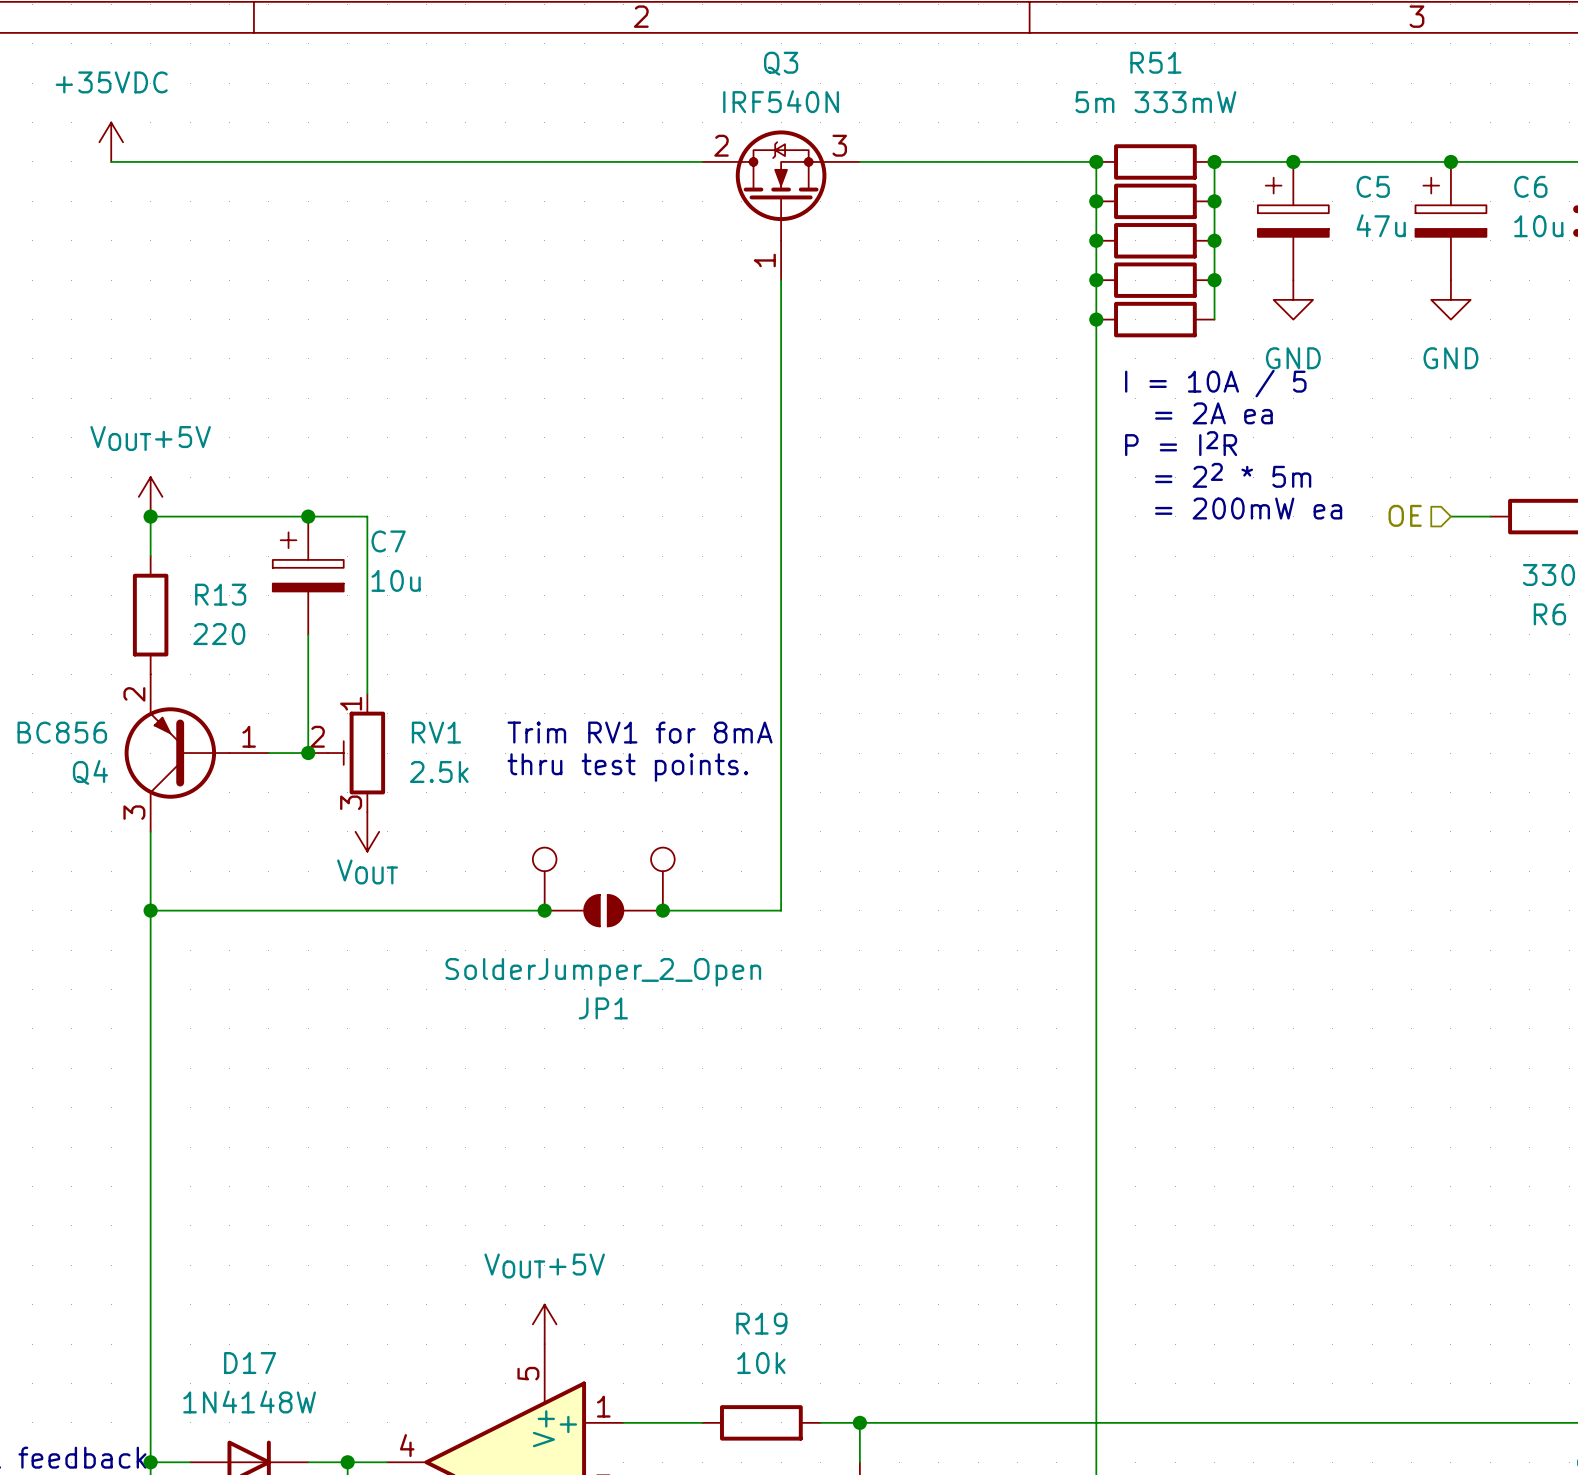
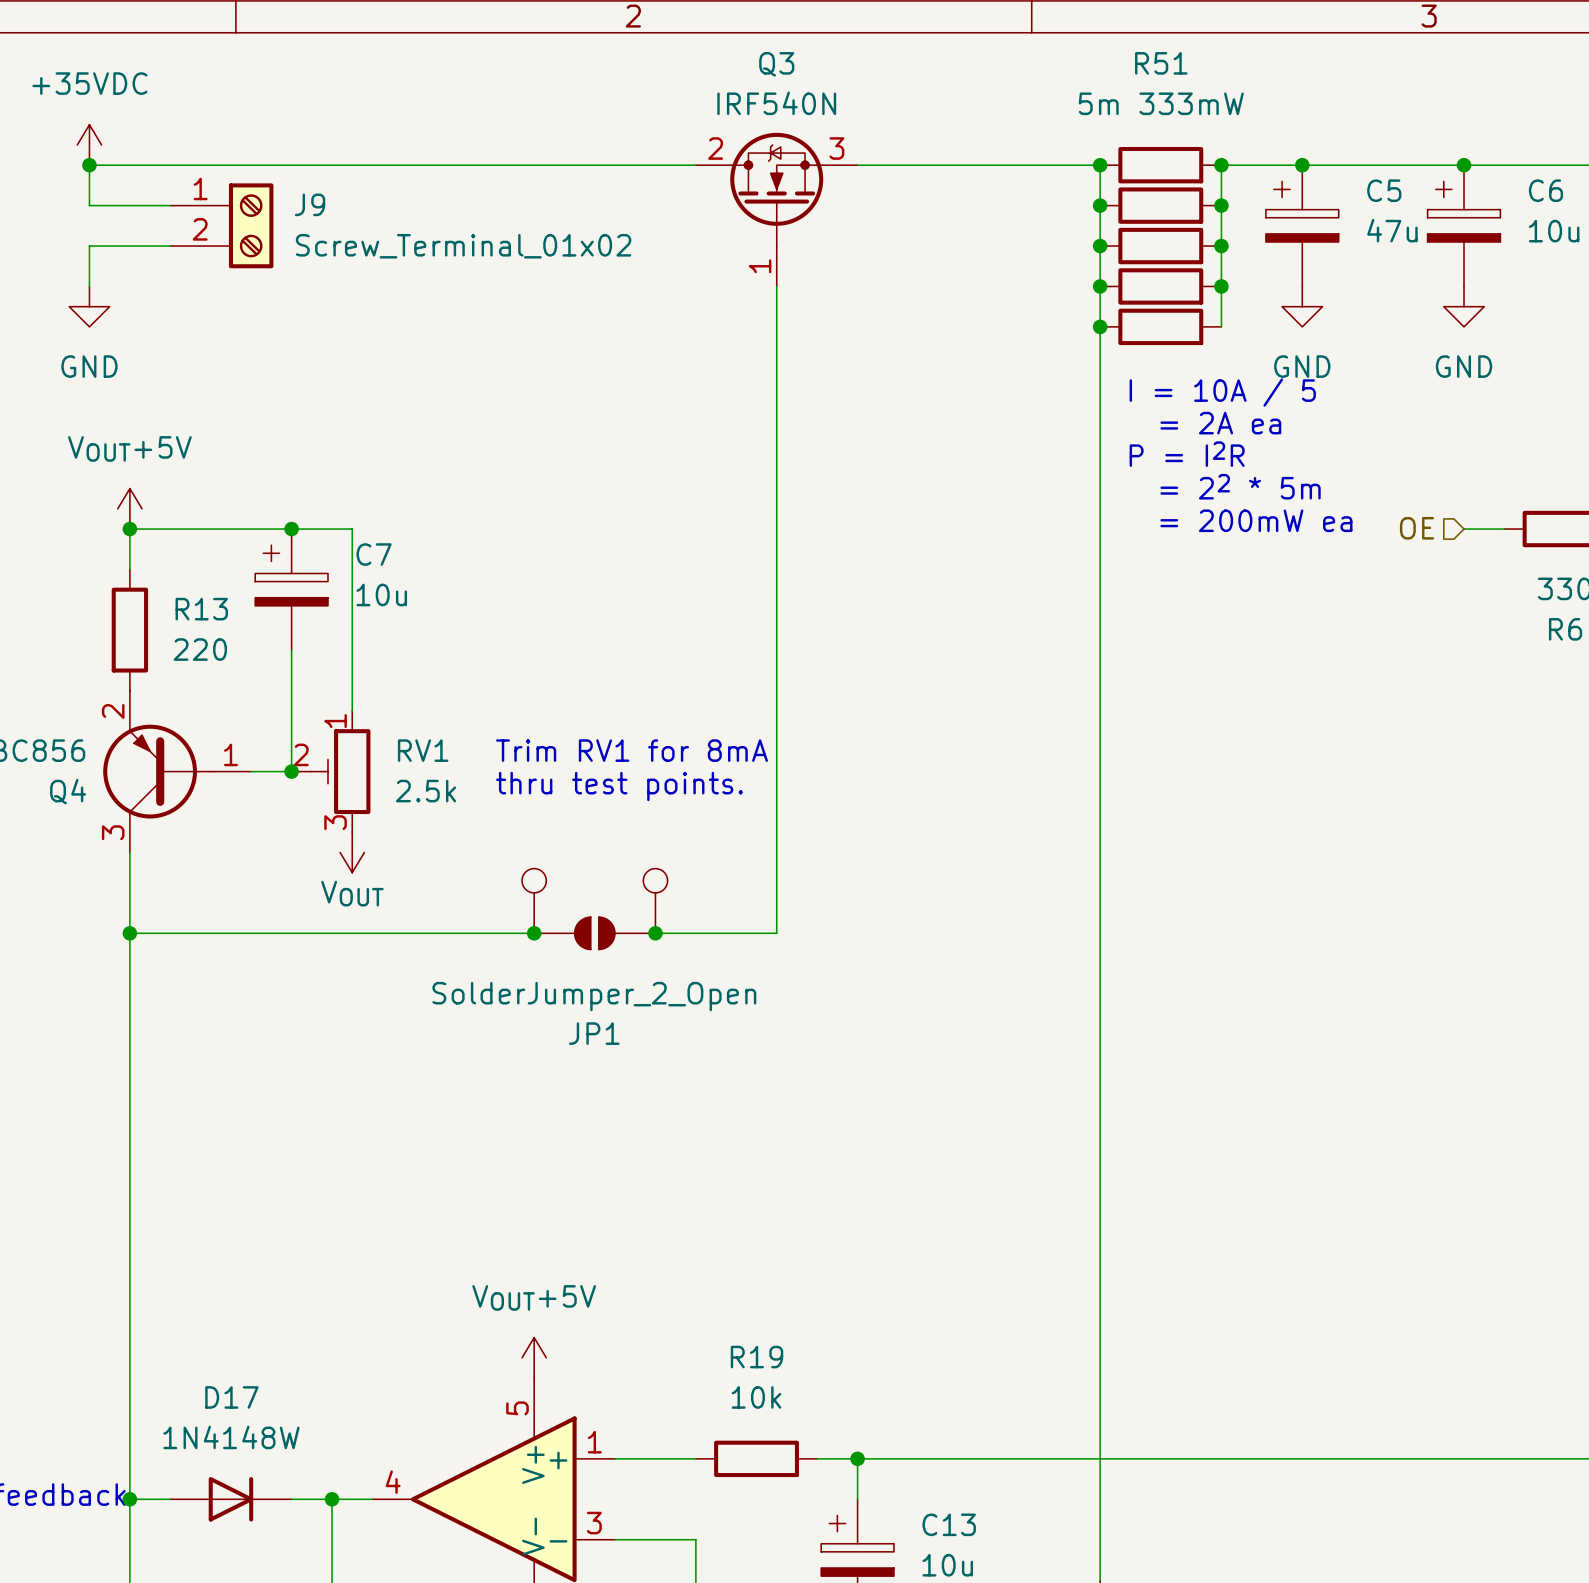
wire: none -> (89, 165) (89, 205) (170, 205)
junction: none -> (89, 165)
J9: none -> Screw_Terminal_01x02 (221, 225)
wire: none -> (170, 246) (89, 246) (89, 286)
power symbol: none -> GND (89, 306)

